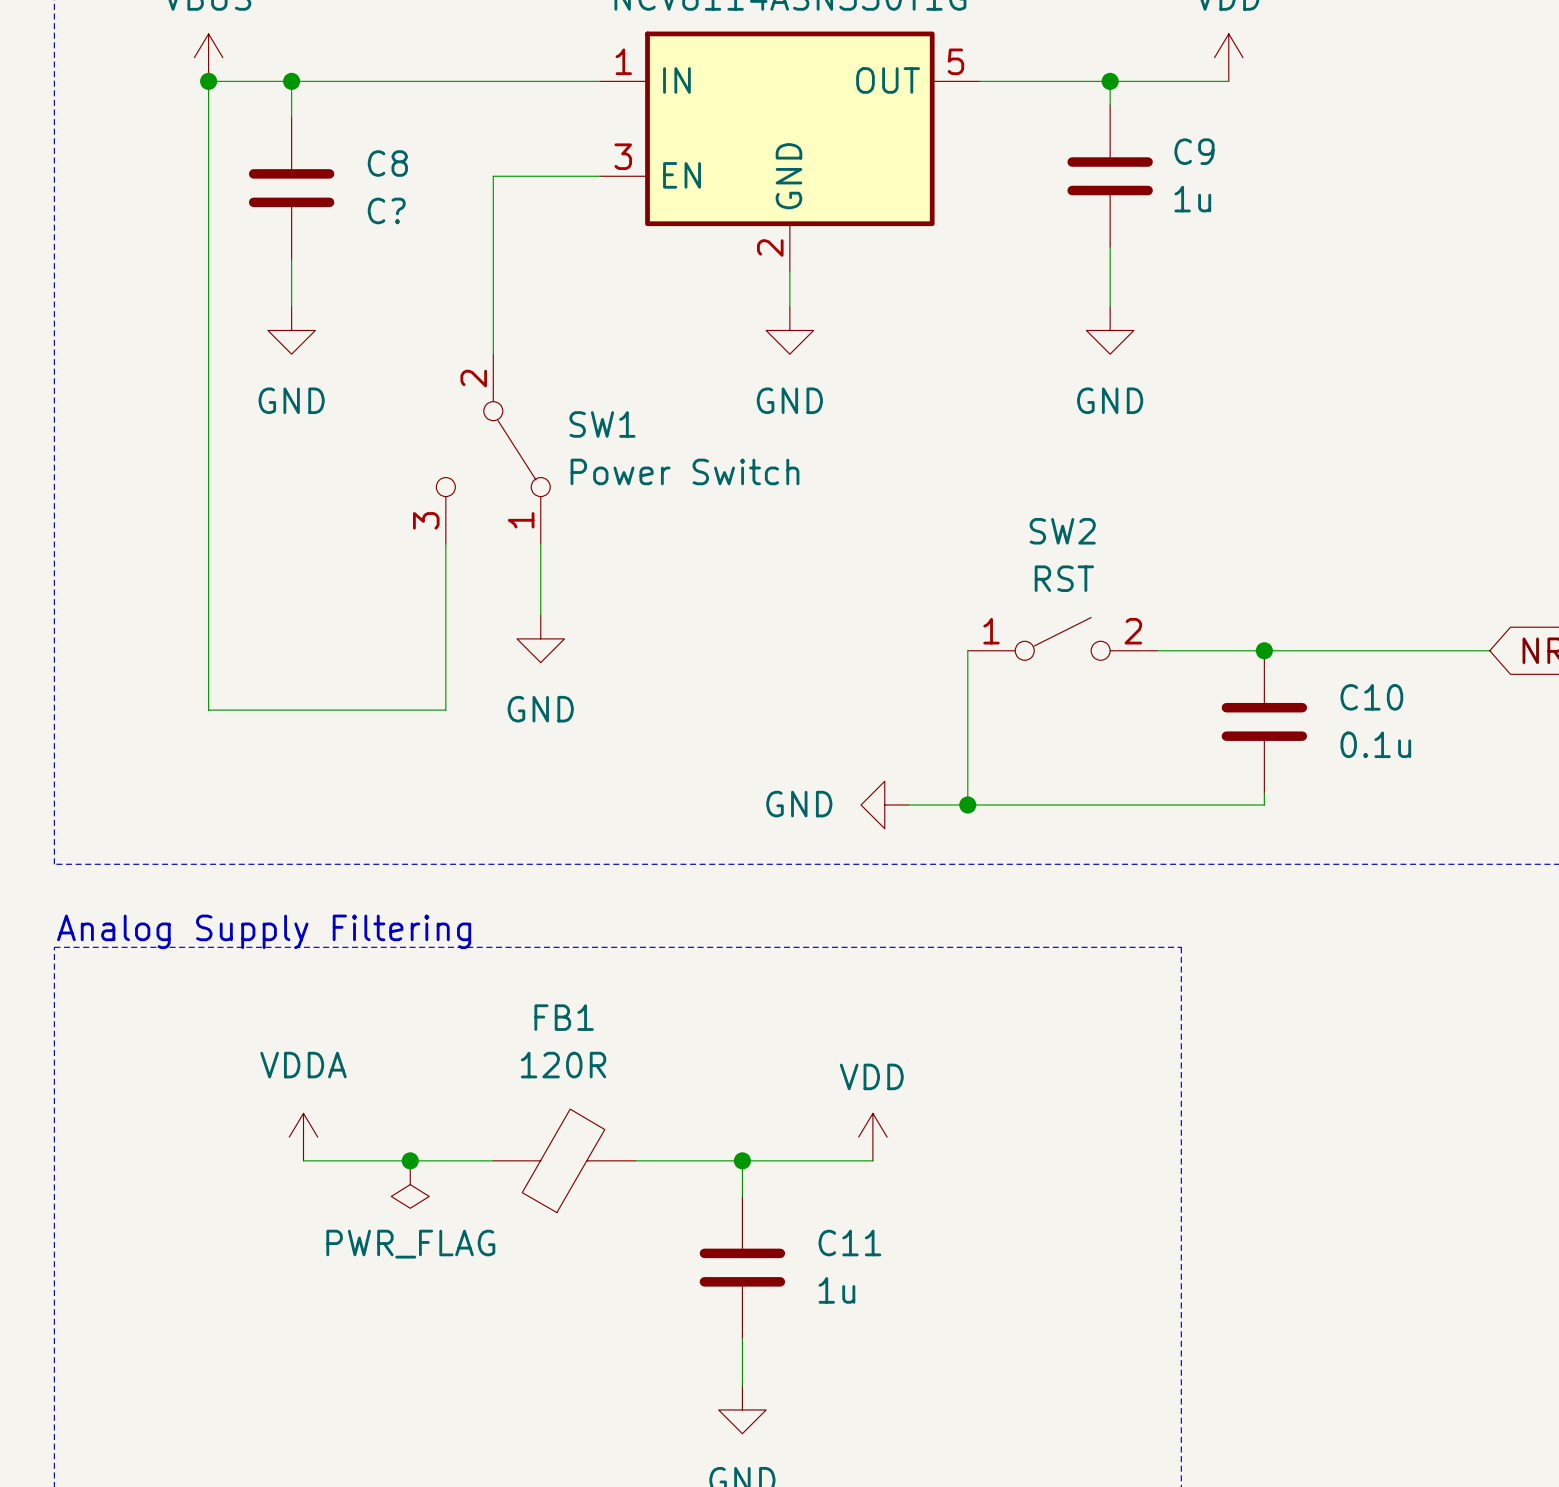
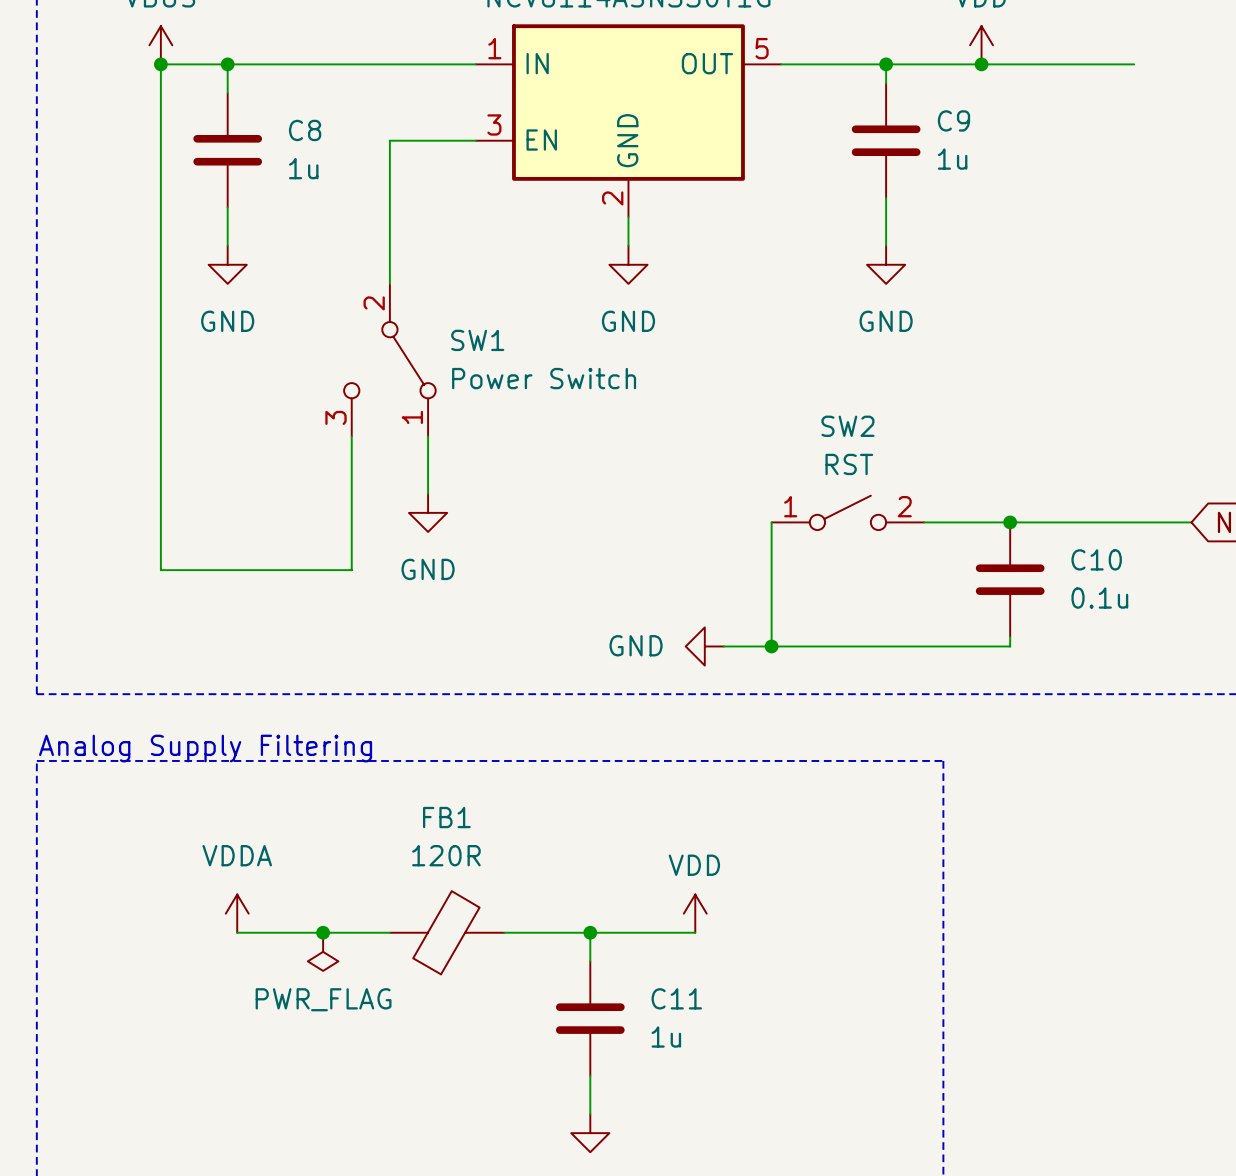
wire: none -> (981, 64) (1134, 64)
junction: none -> (981, 64)
C8 value: C? (386, 210) -> 1u (303, 168)

